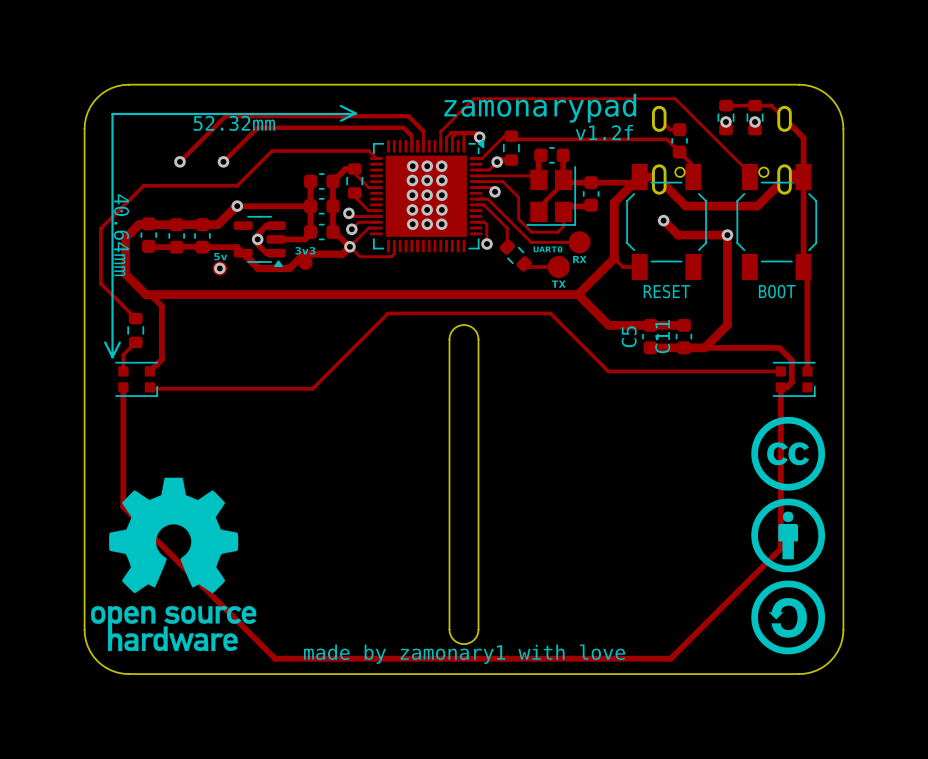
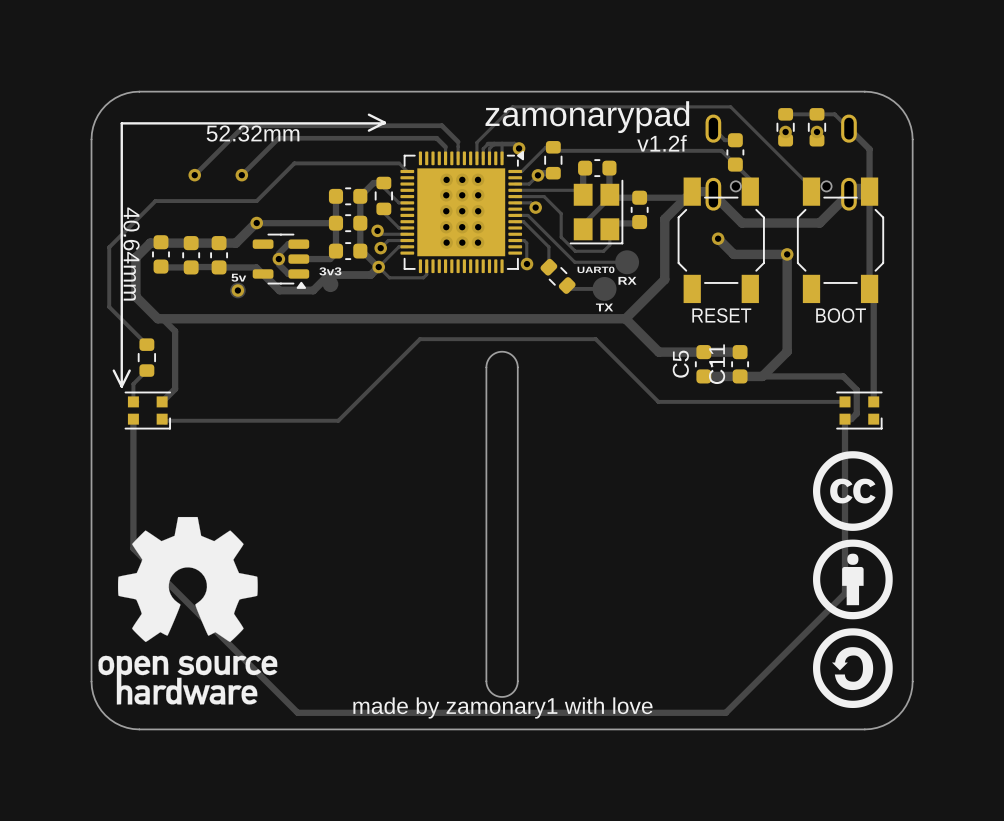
track: (614, 258) (623, 267) (639, 267) -> none

